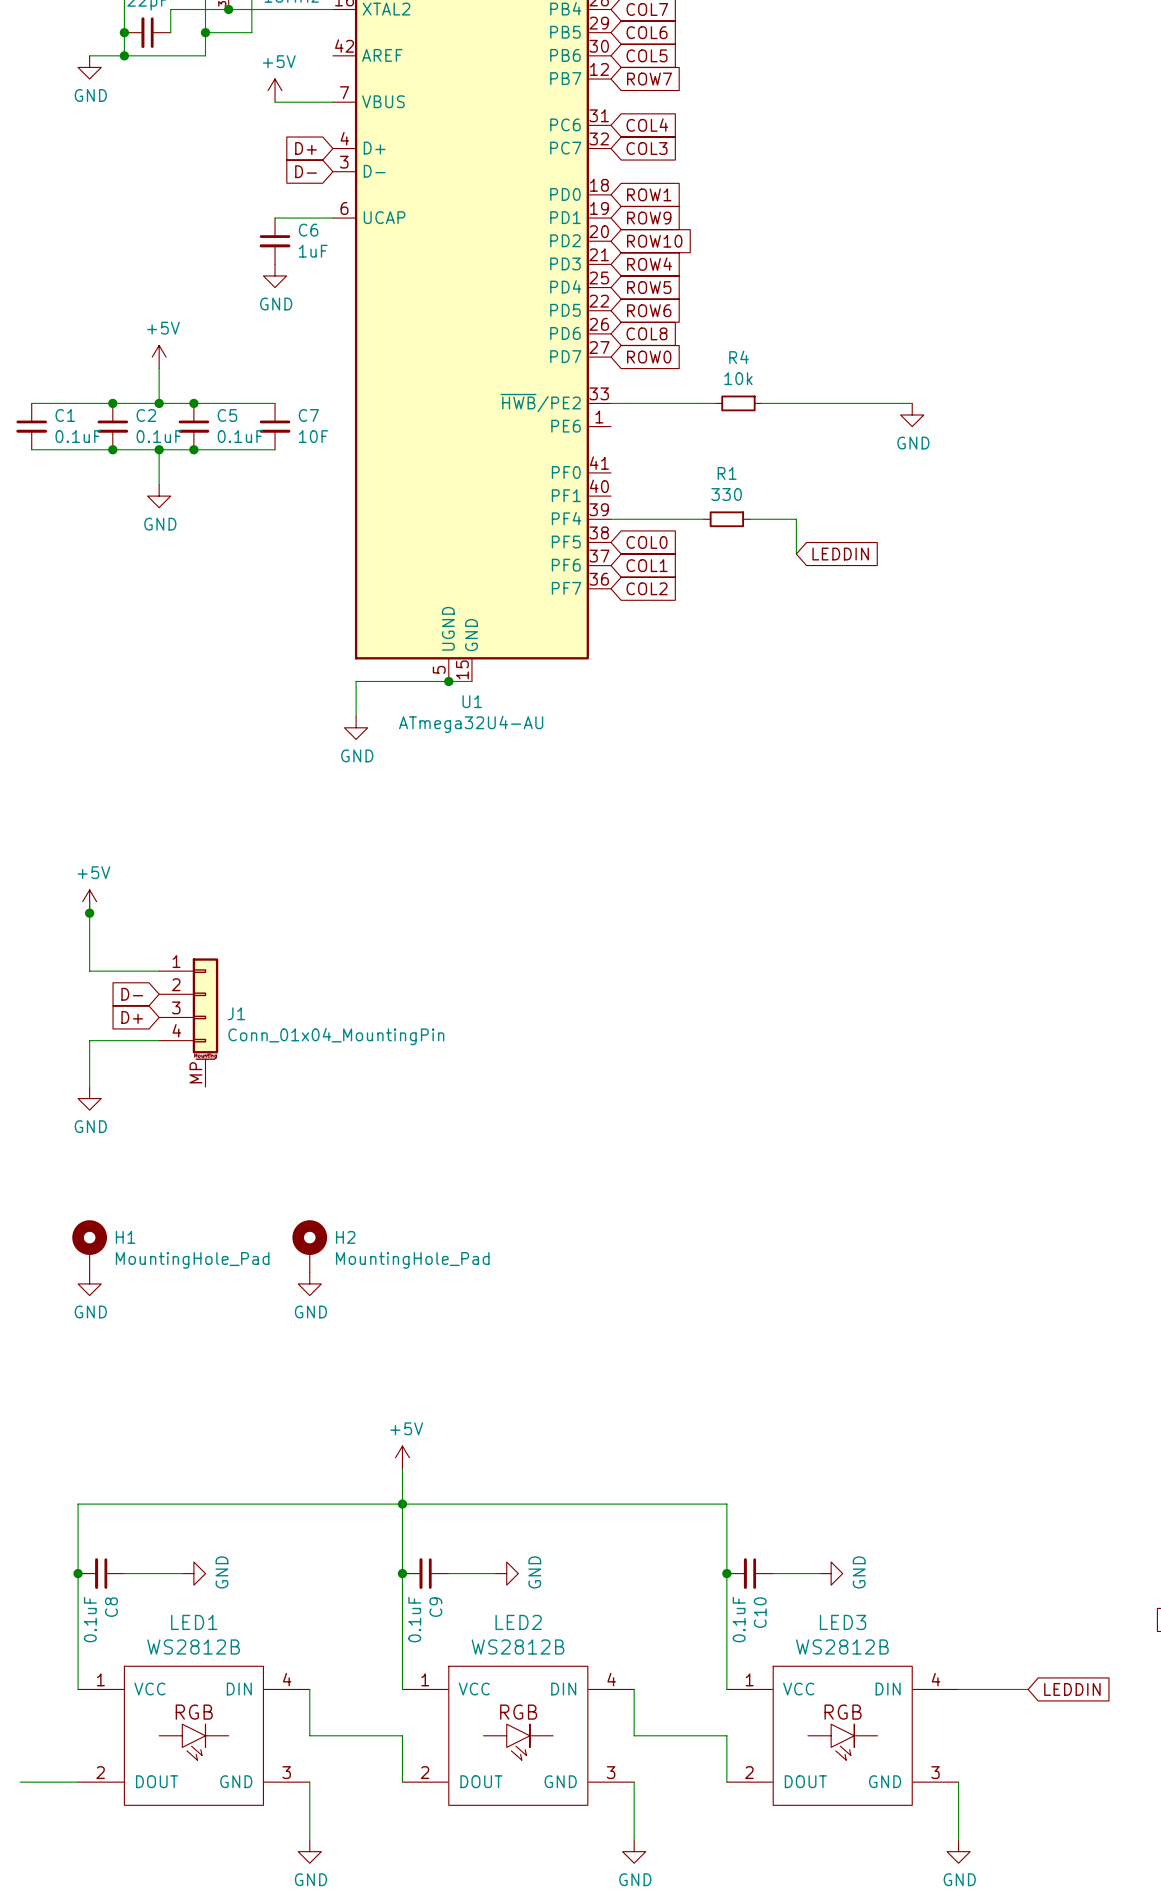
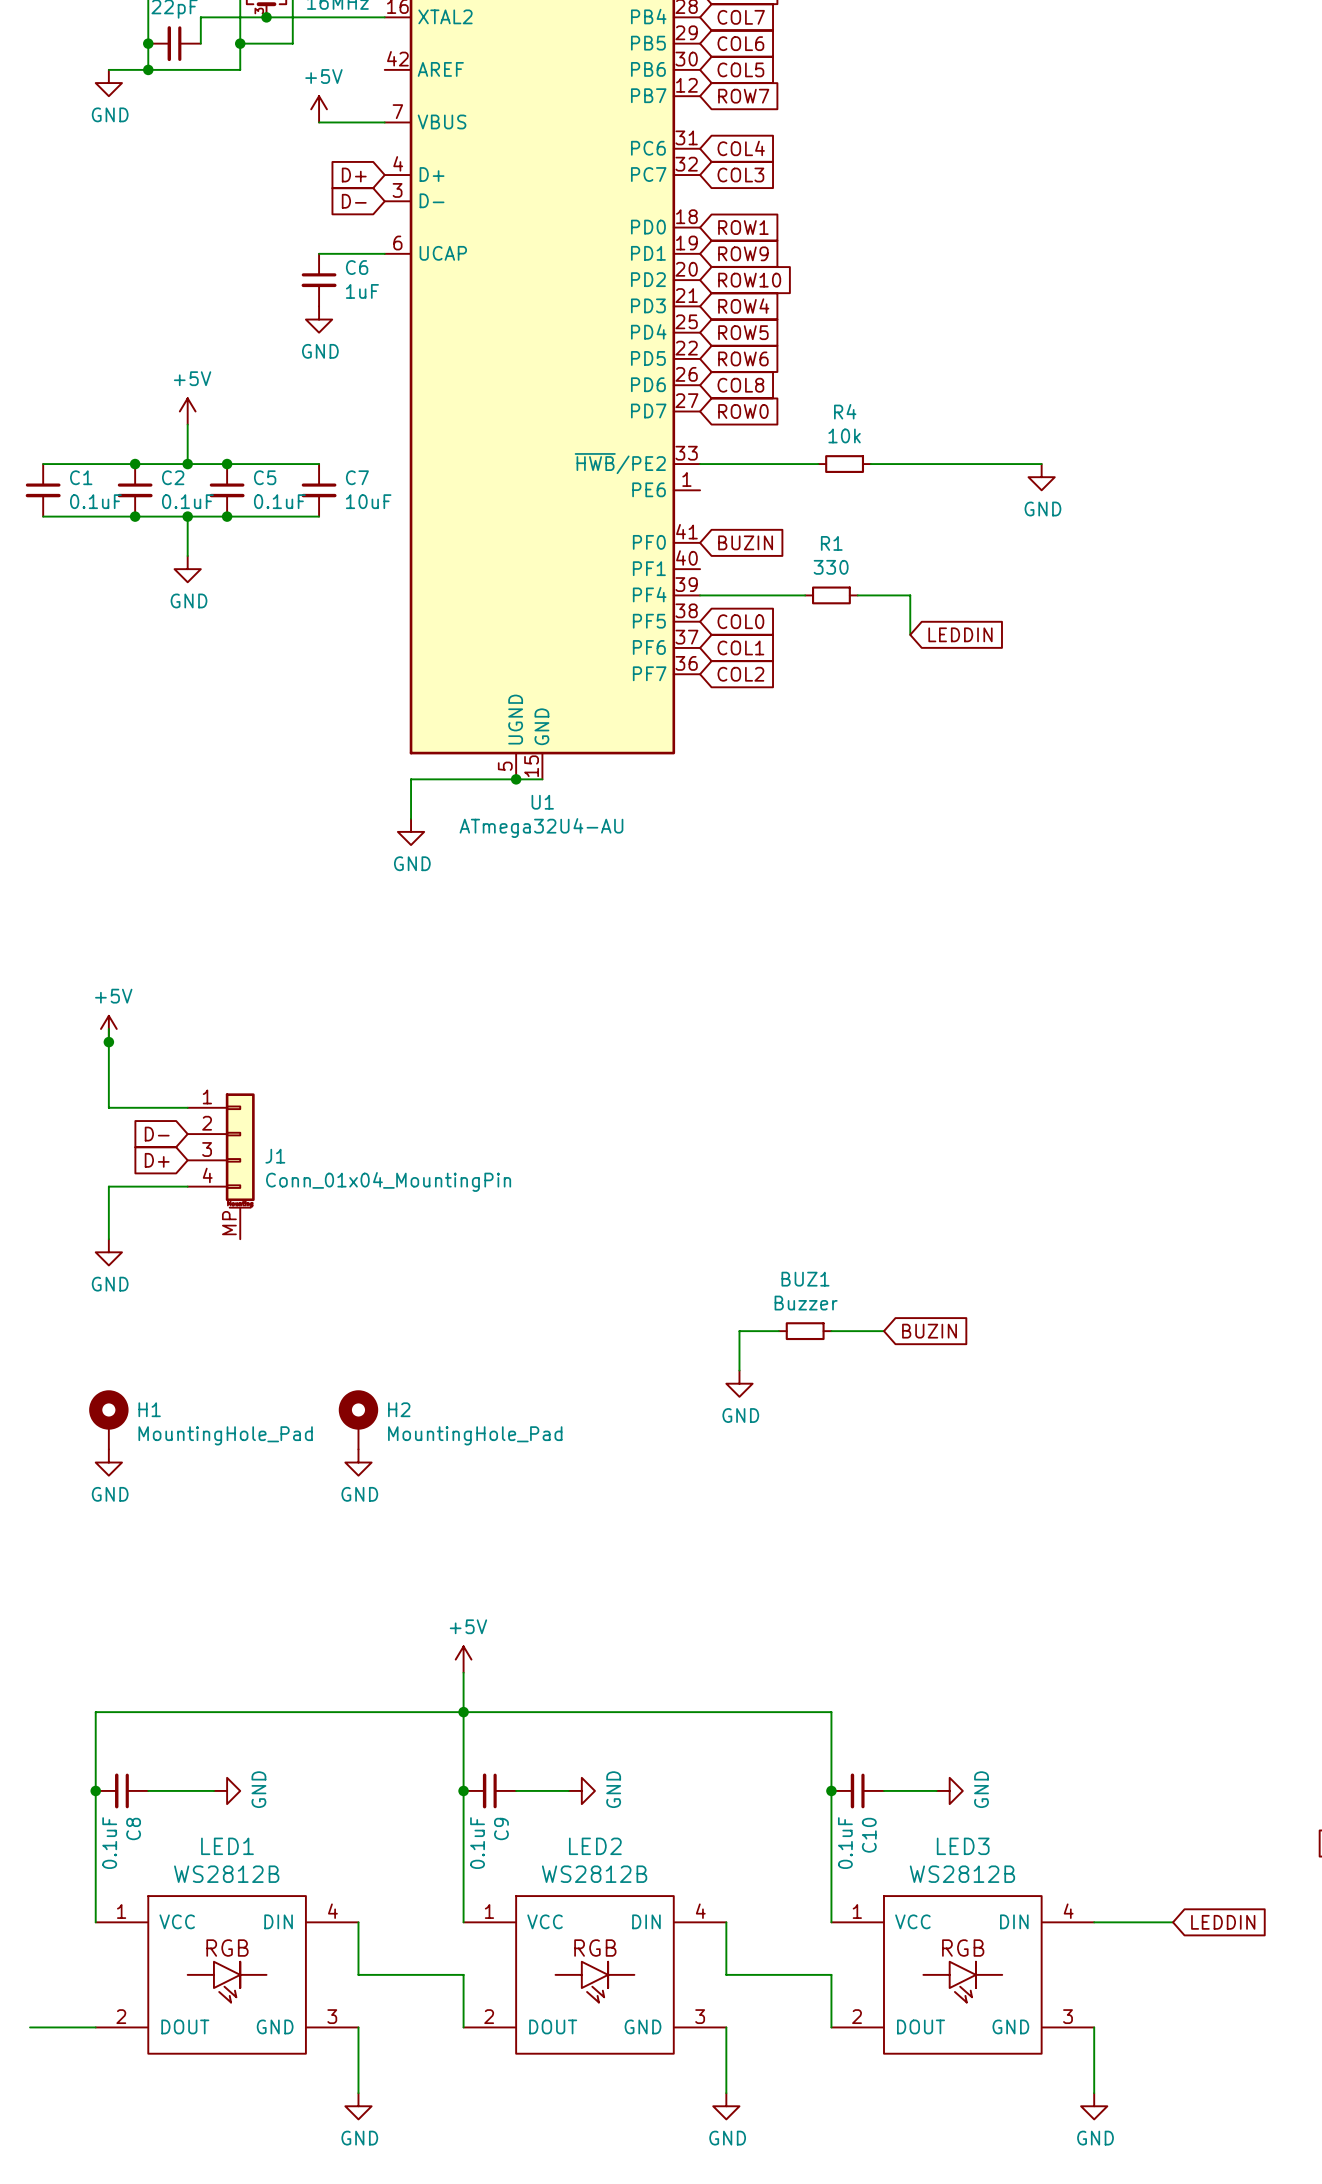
C7 value: 10F (313, 436) -> 10uF (368, 501)
global label: none -> BUZIN (745, 542)
wire: none -> (778, 1331) (739, 1331) (739, 1370)
BUZ1: none -> Buzzer (805, 1331)
wire: none -> (831, 1331) (883, 1331)
global label: none -> BUZIN (929, 1331)
power symbol: none -> GND (739, 1383)

